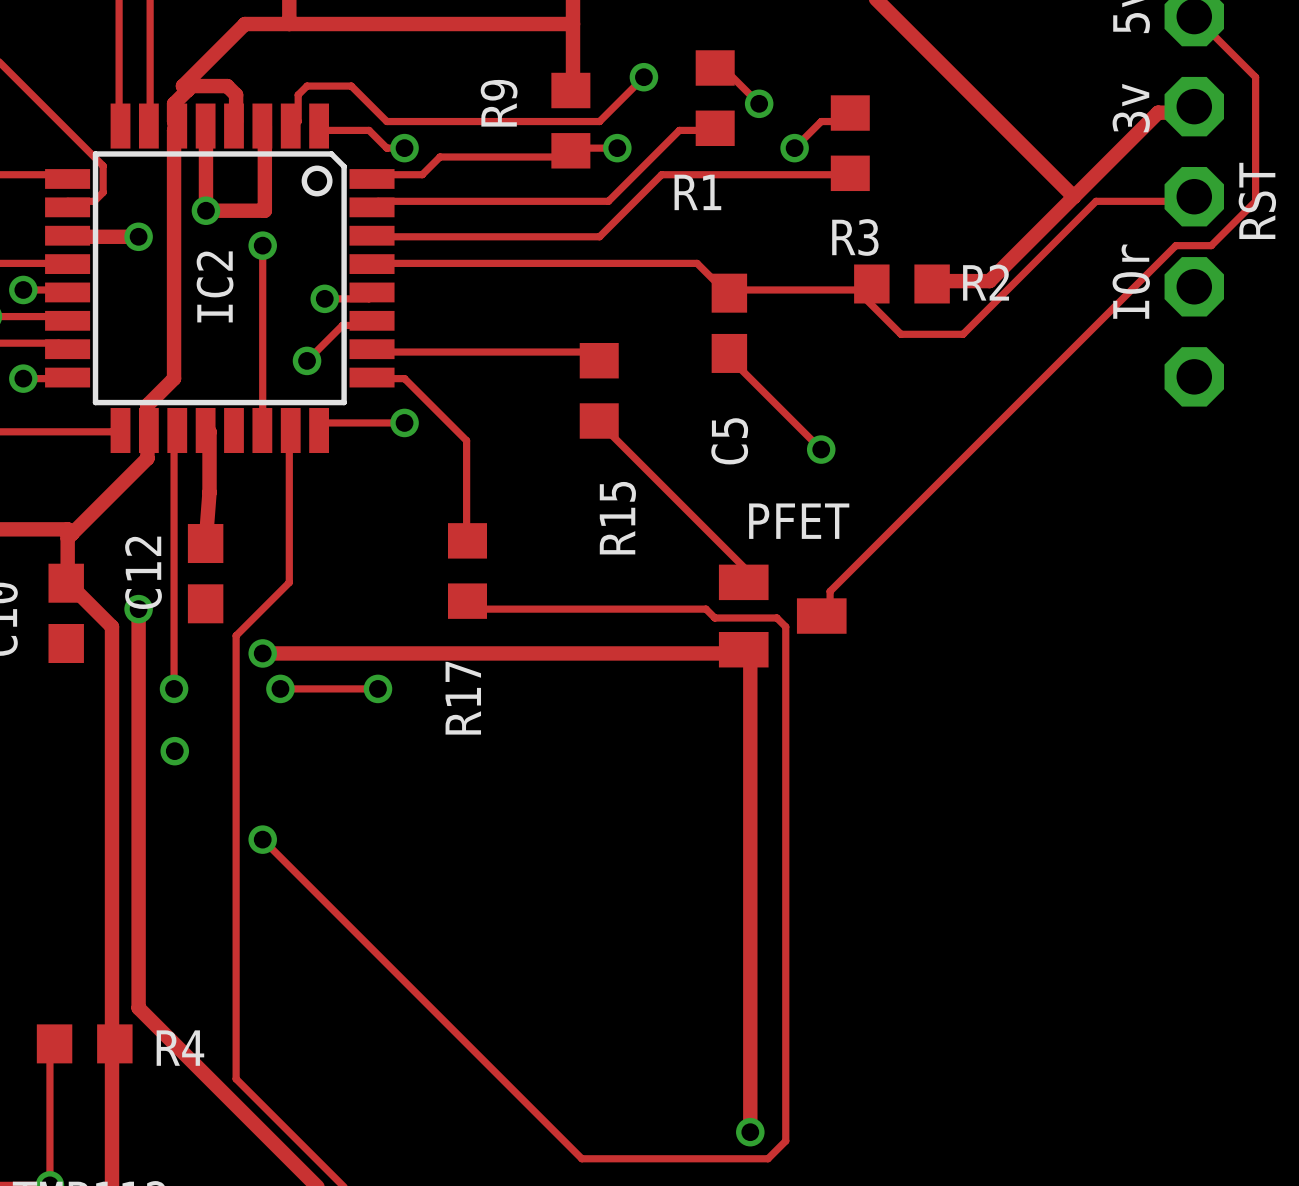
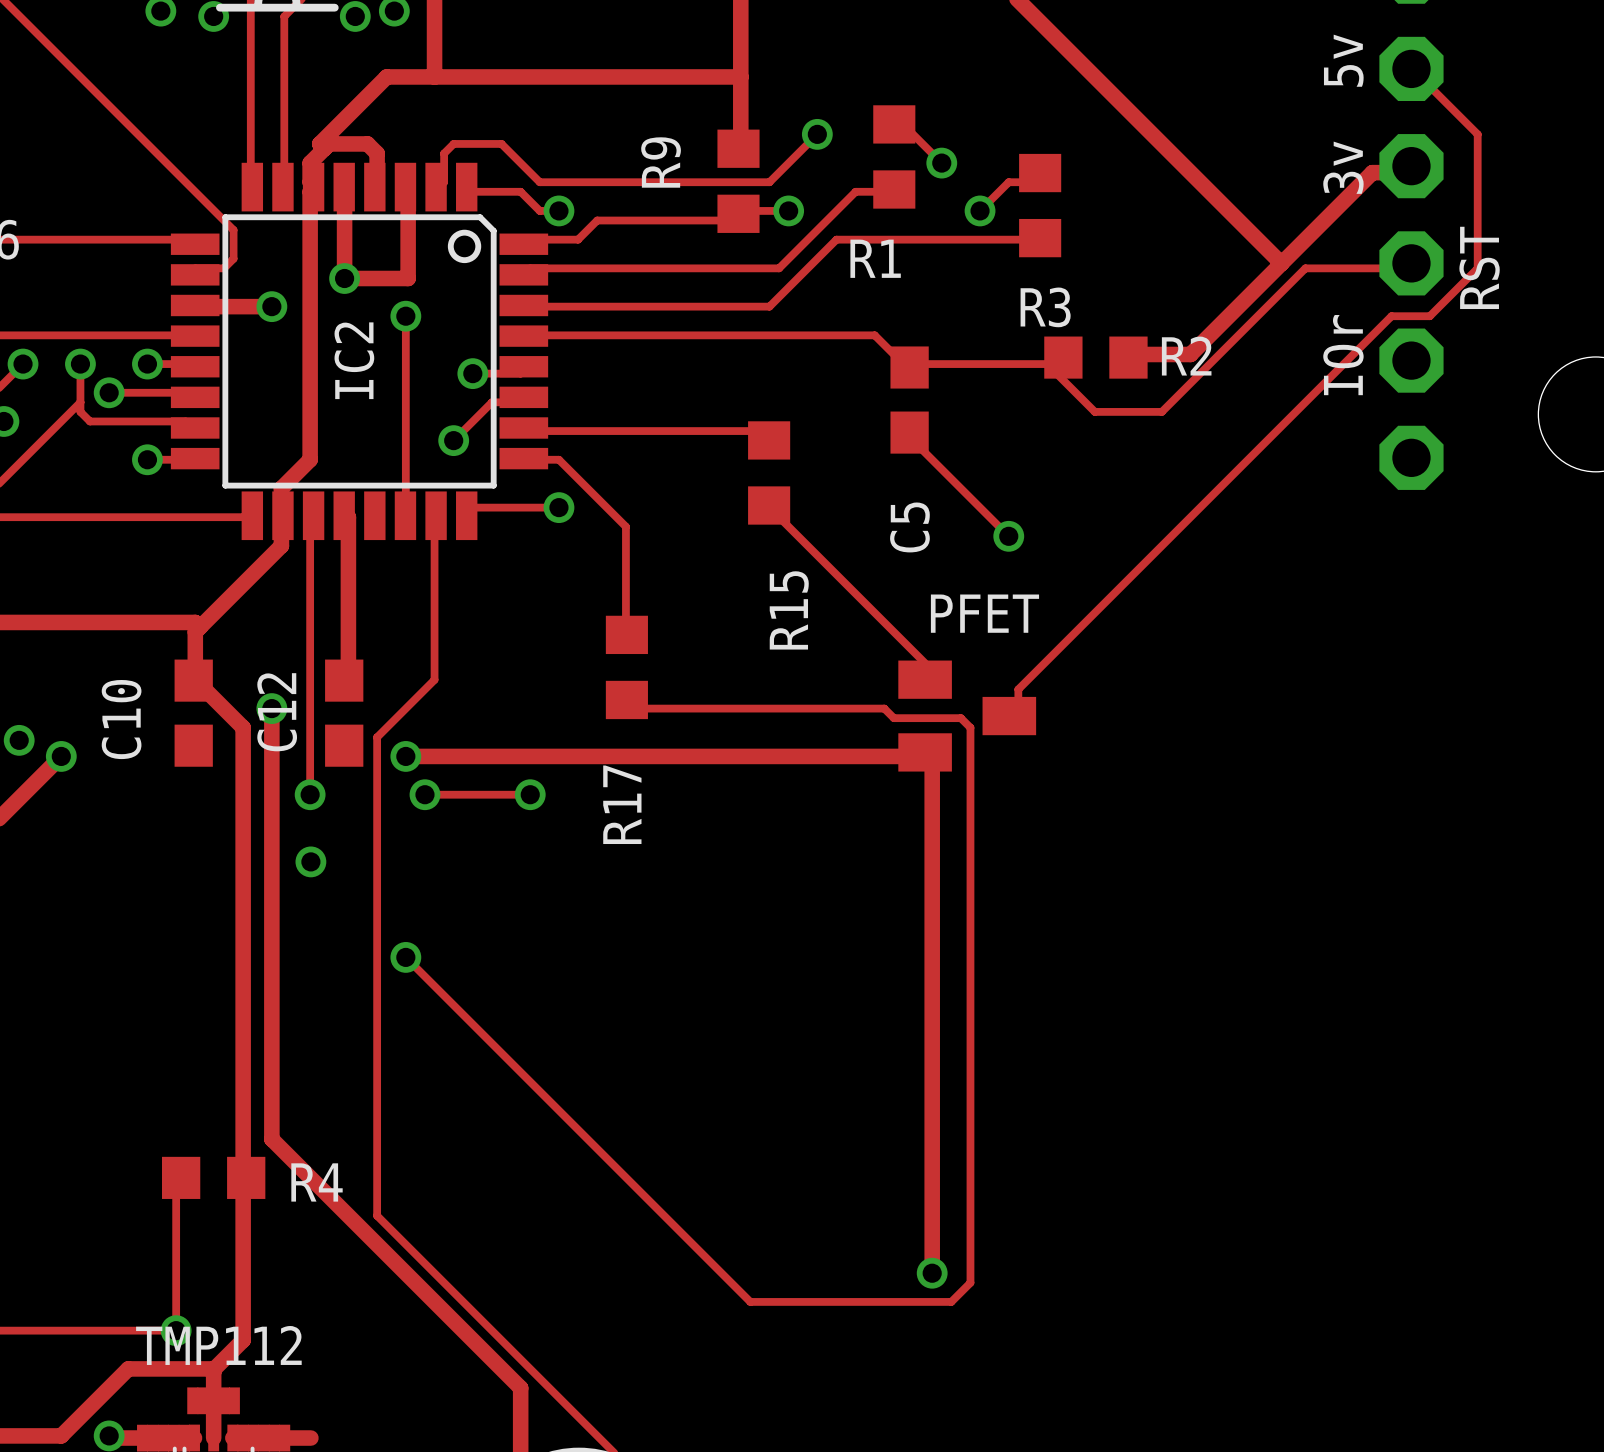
track: (209, 492) (205, 543) -> (348, 582) (348, 679) (344, 680)
C12 position: (205, 573) -> (344, 713)

